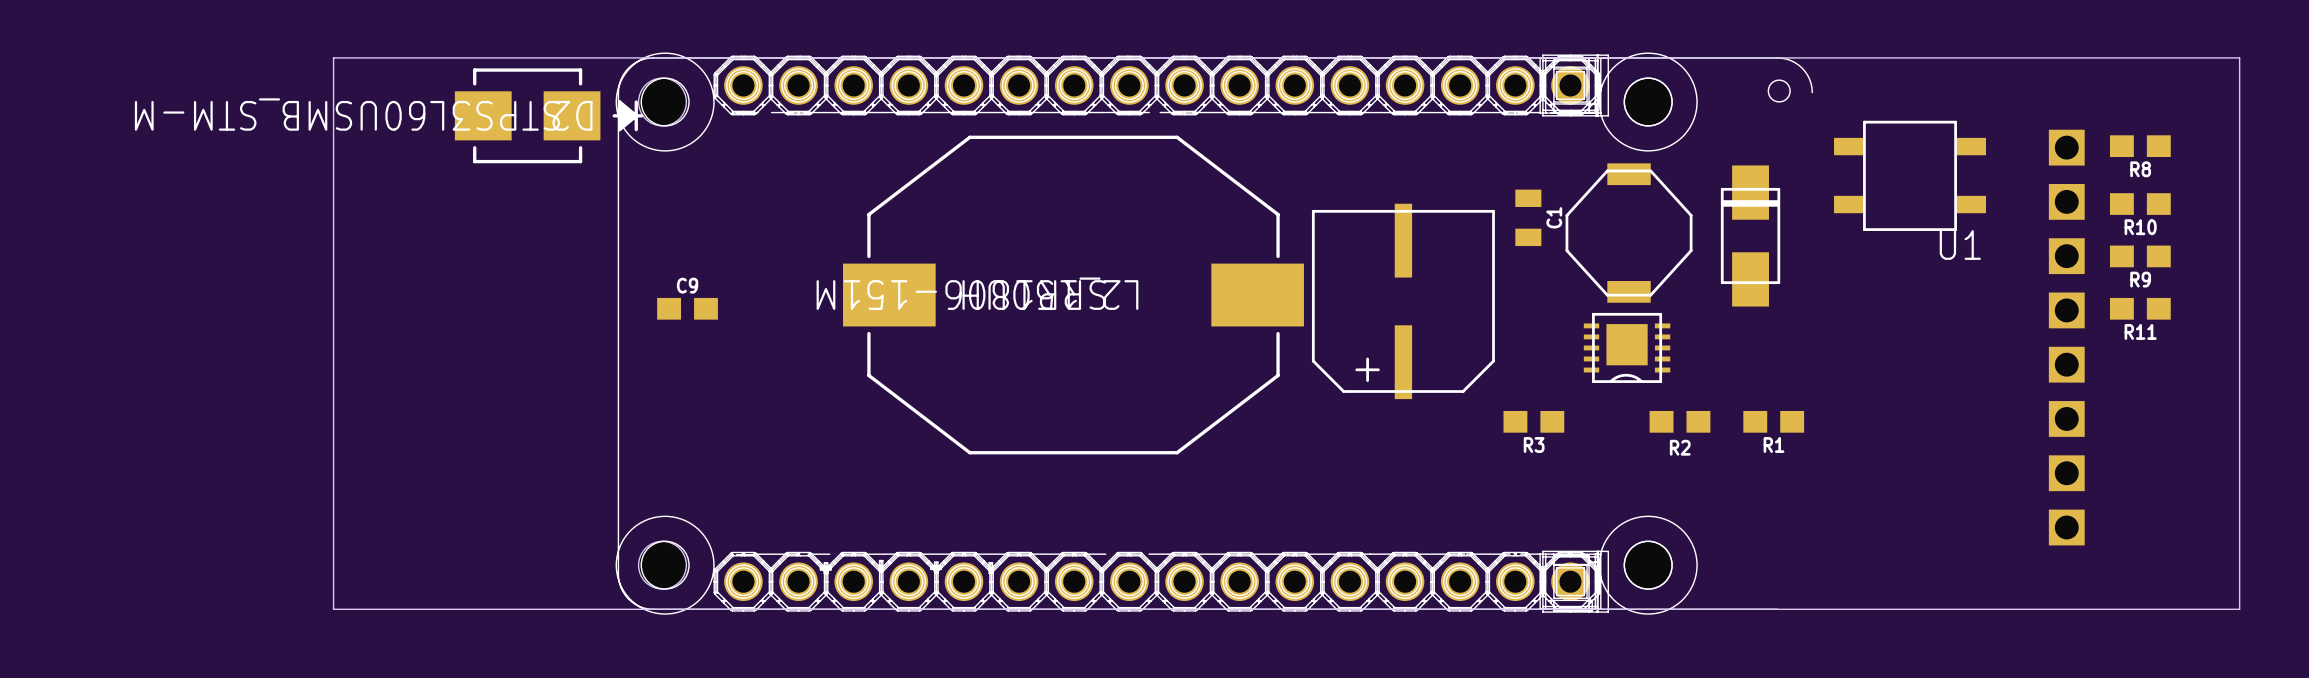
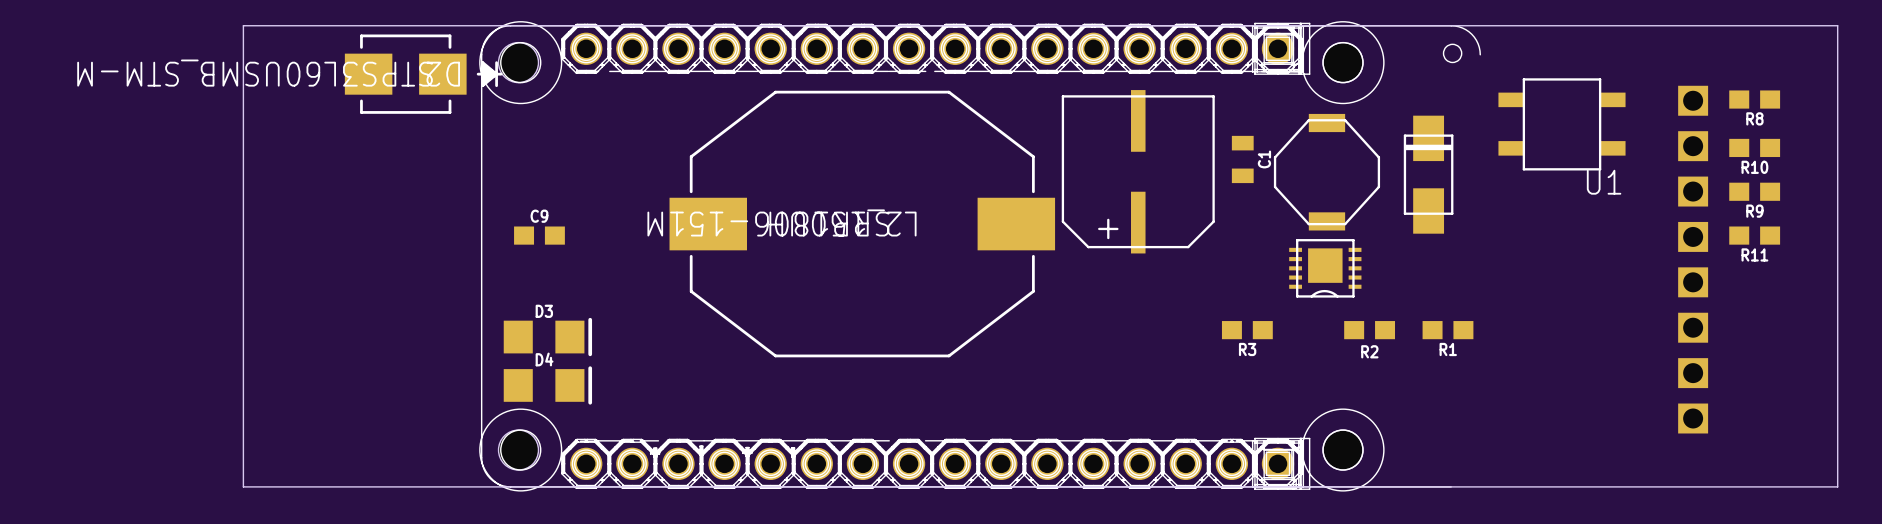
part position: (1403, 301) -> (1138, 171)
D3: none -> (547, 337)
D4: none -> (547, 385)

